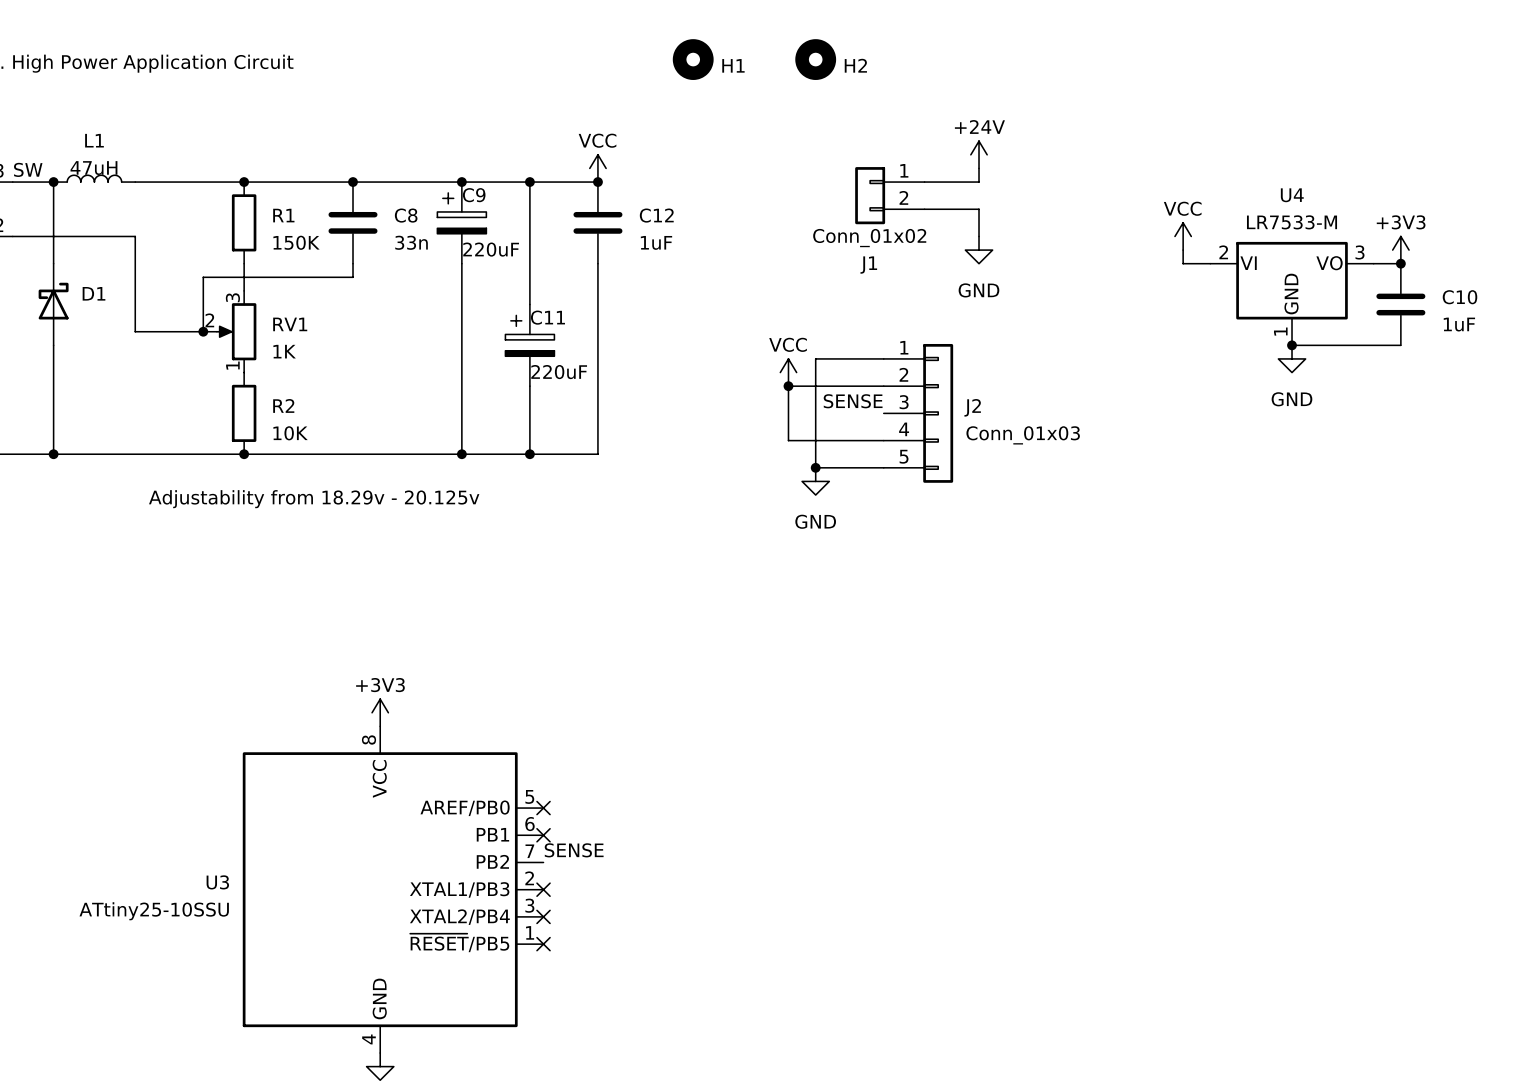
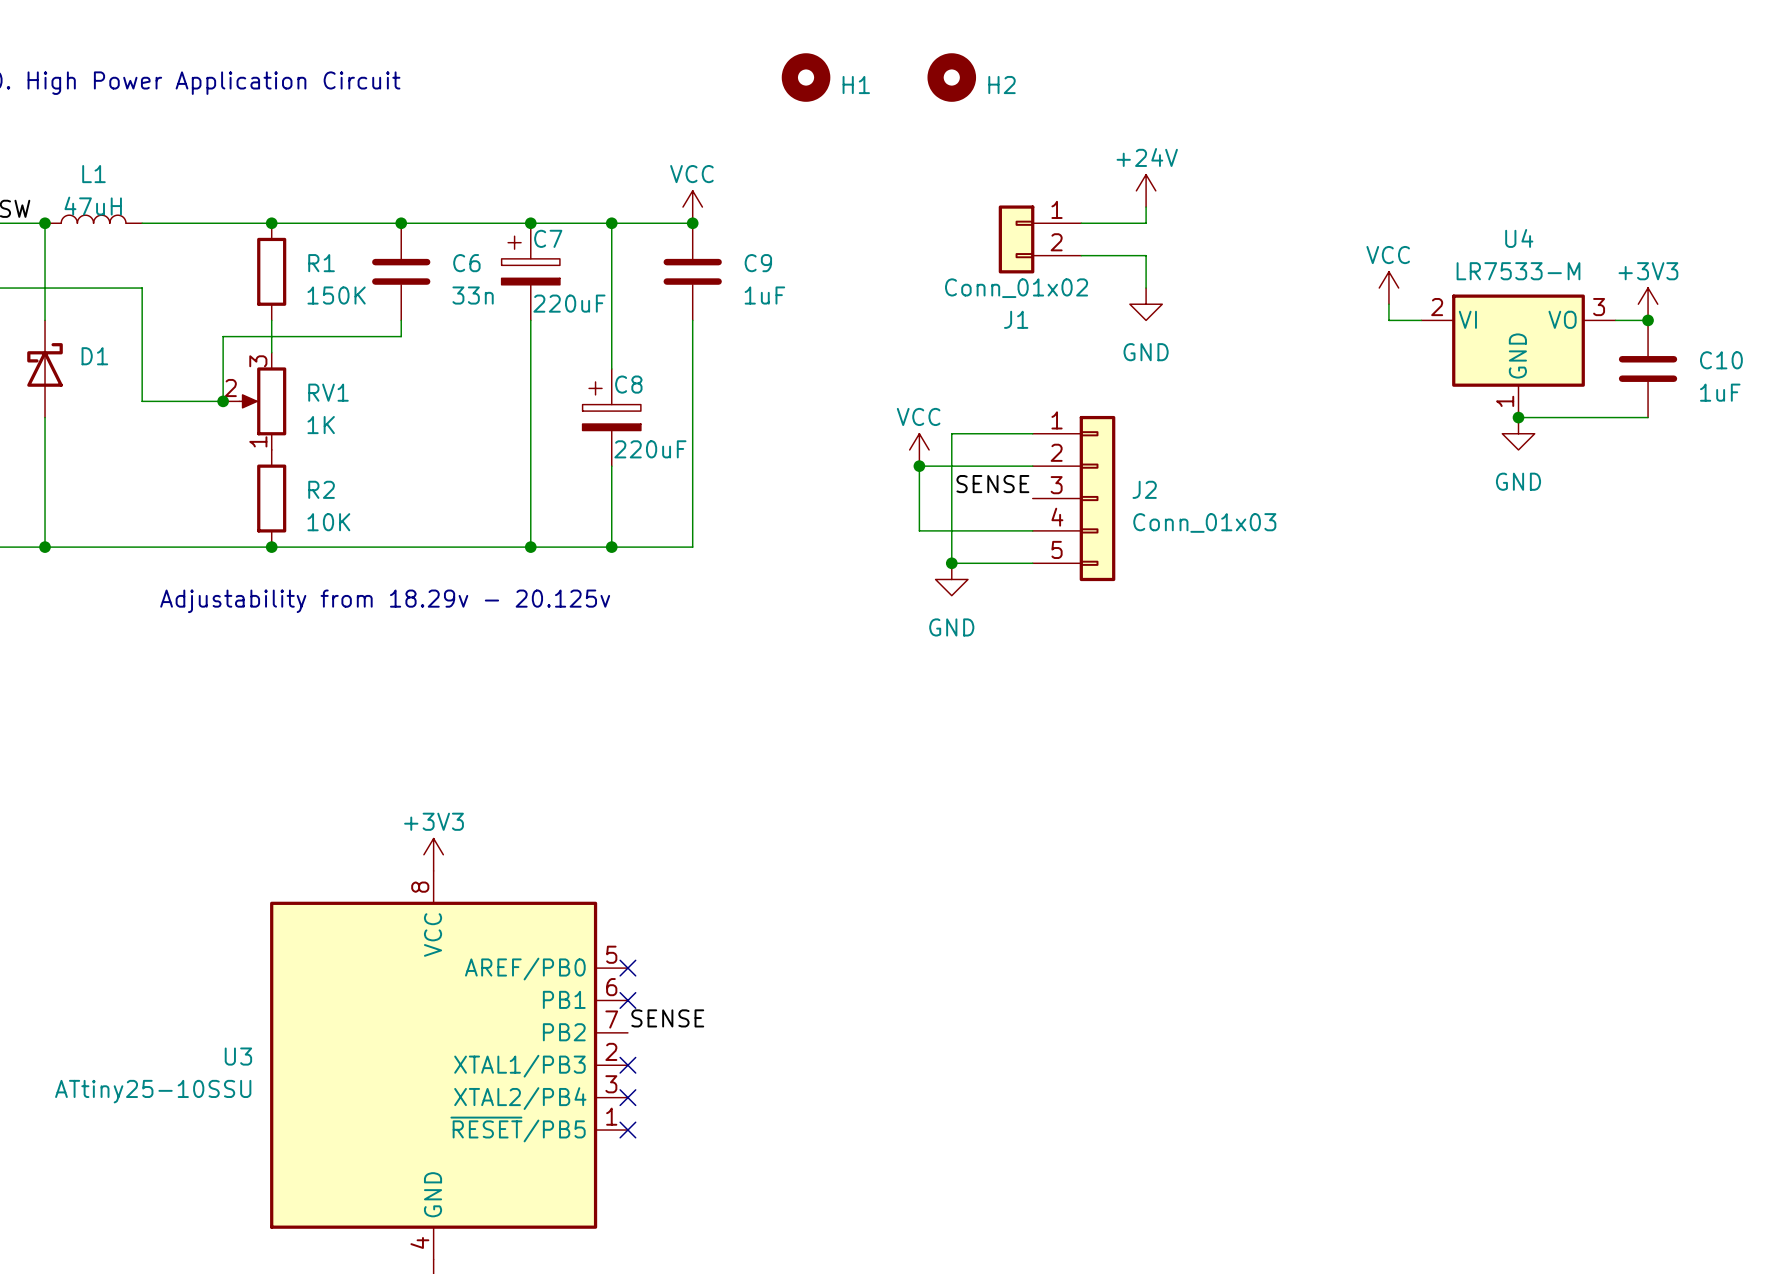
C9 name: C9 (474, 195) -> C7 (548, 238)
C8 name: C8 (406, 215) -> C6 (466, 263)
C12 name: C12 (656, 215) -> C9 (758, 263)
C11 name: C11 (547, 317) -> C8 (628, 384)

